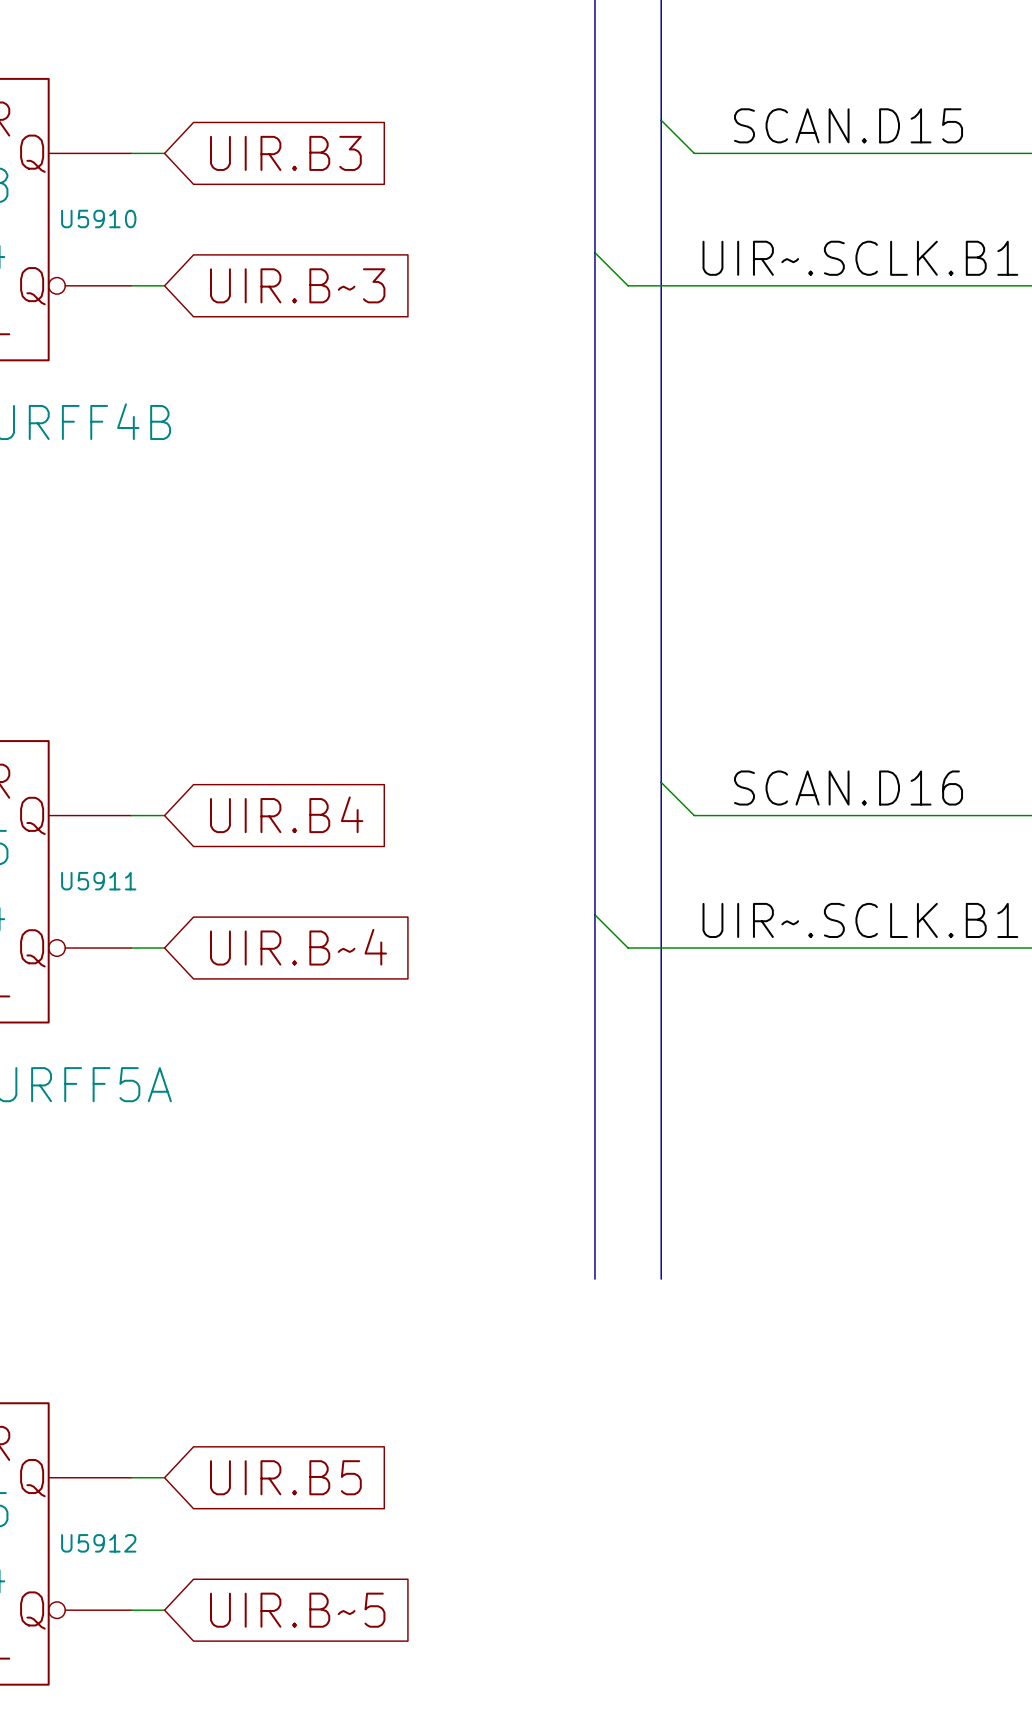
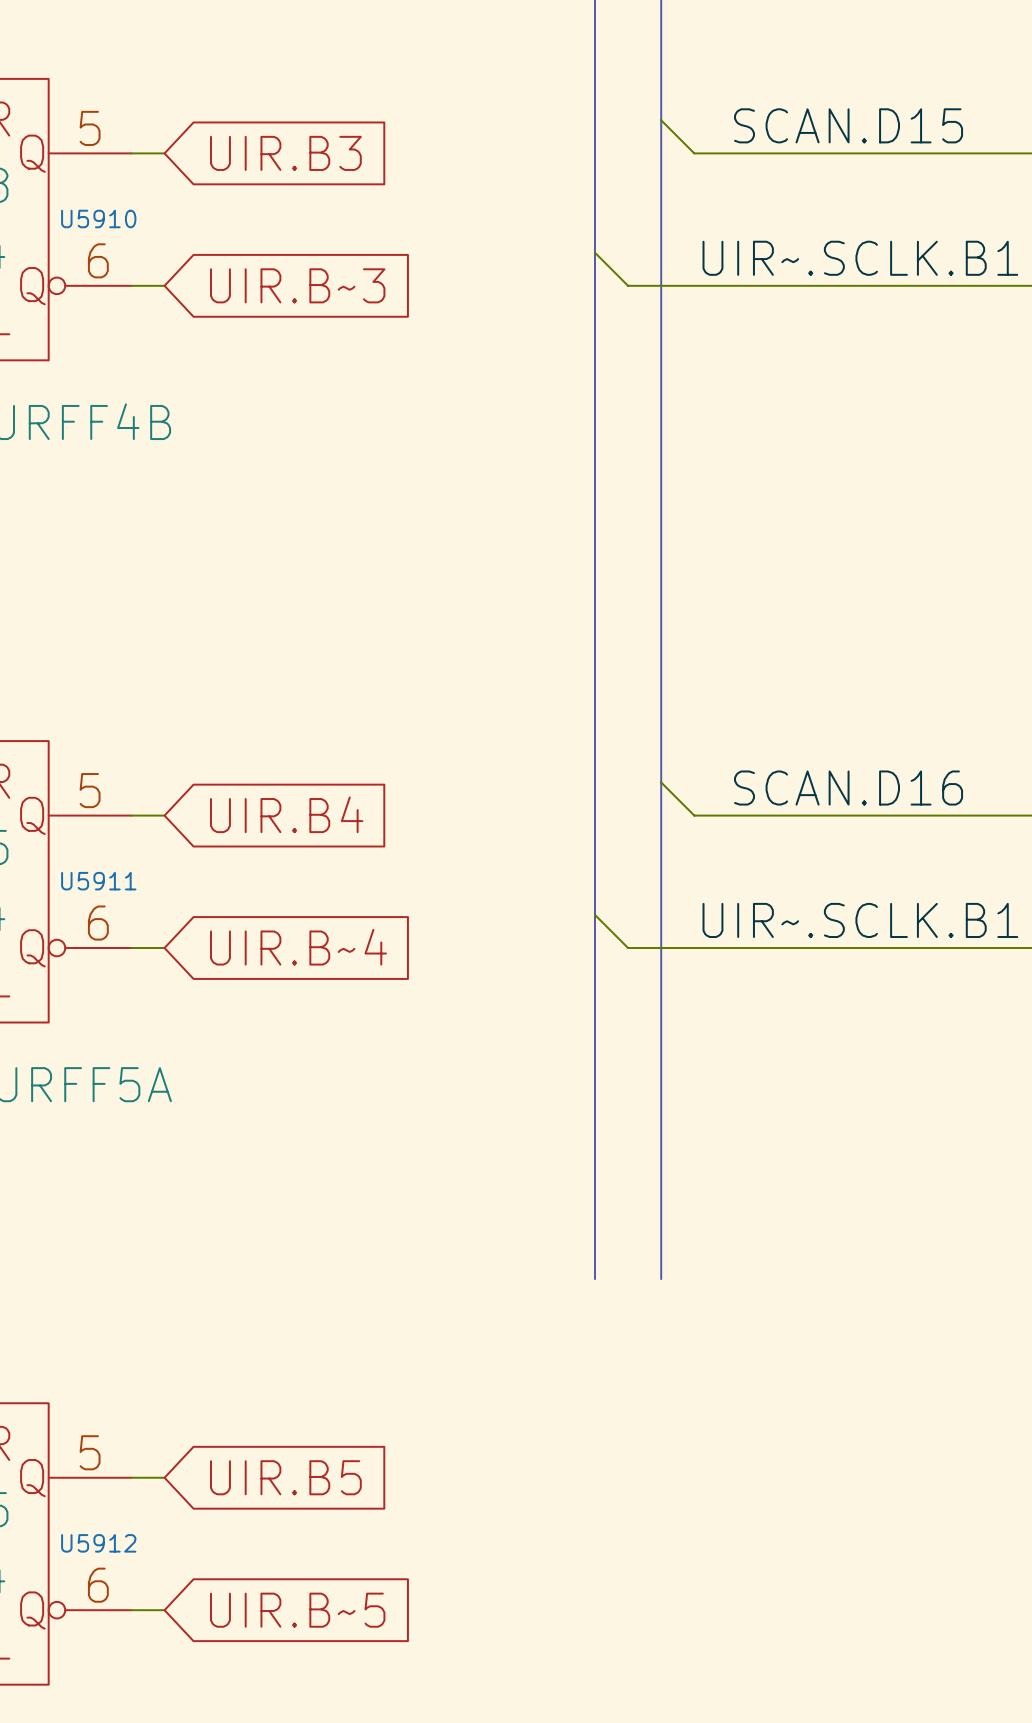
U5910 pin number: none -> 5 (90, 128)
U5910 pin number: none -> 6 (98, 260)
U5911 pin number: none -> 5 (90, 790)
U5911 pin number: none -> 6 (98, 923)
U5912 pin number: none -> 5 (90, 1452)
U5912 pin number: none -> 6 (98, 1585)

